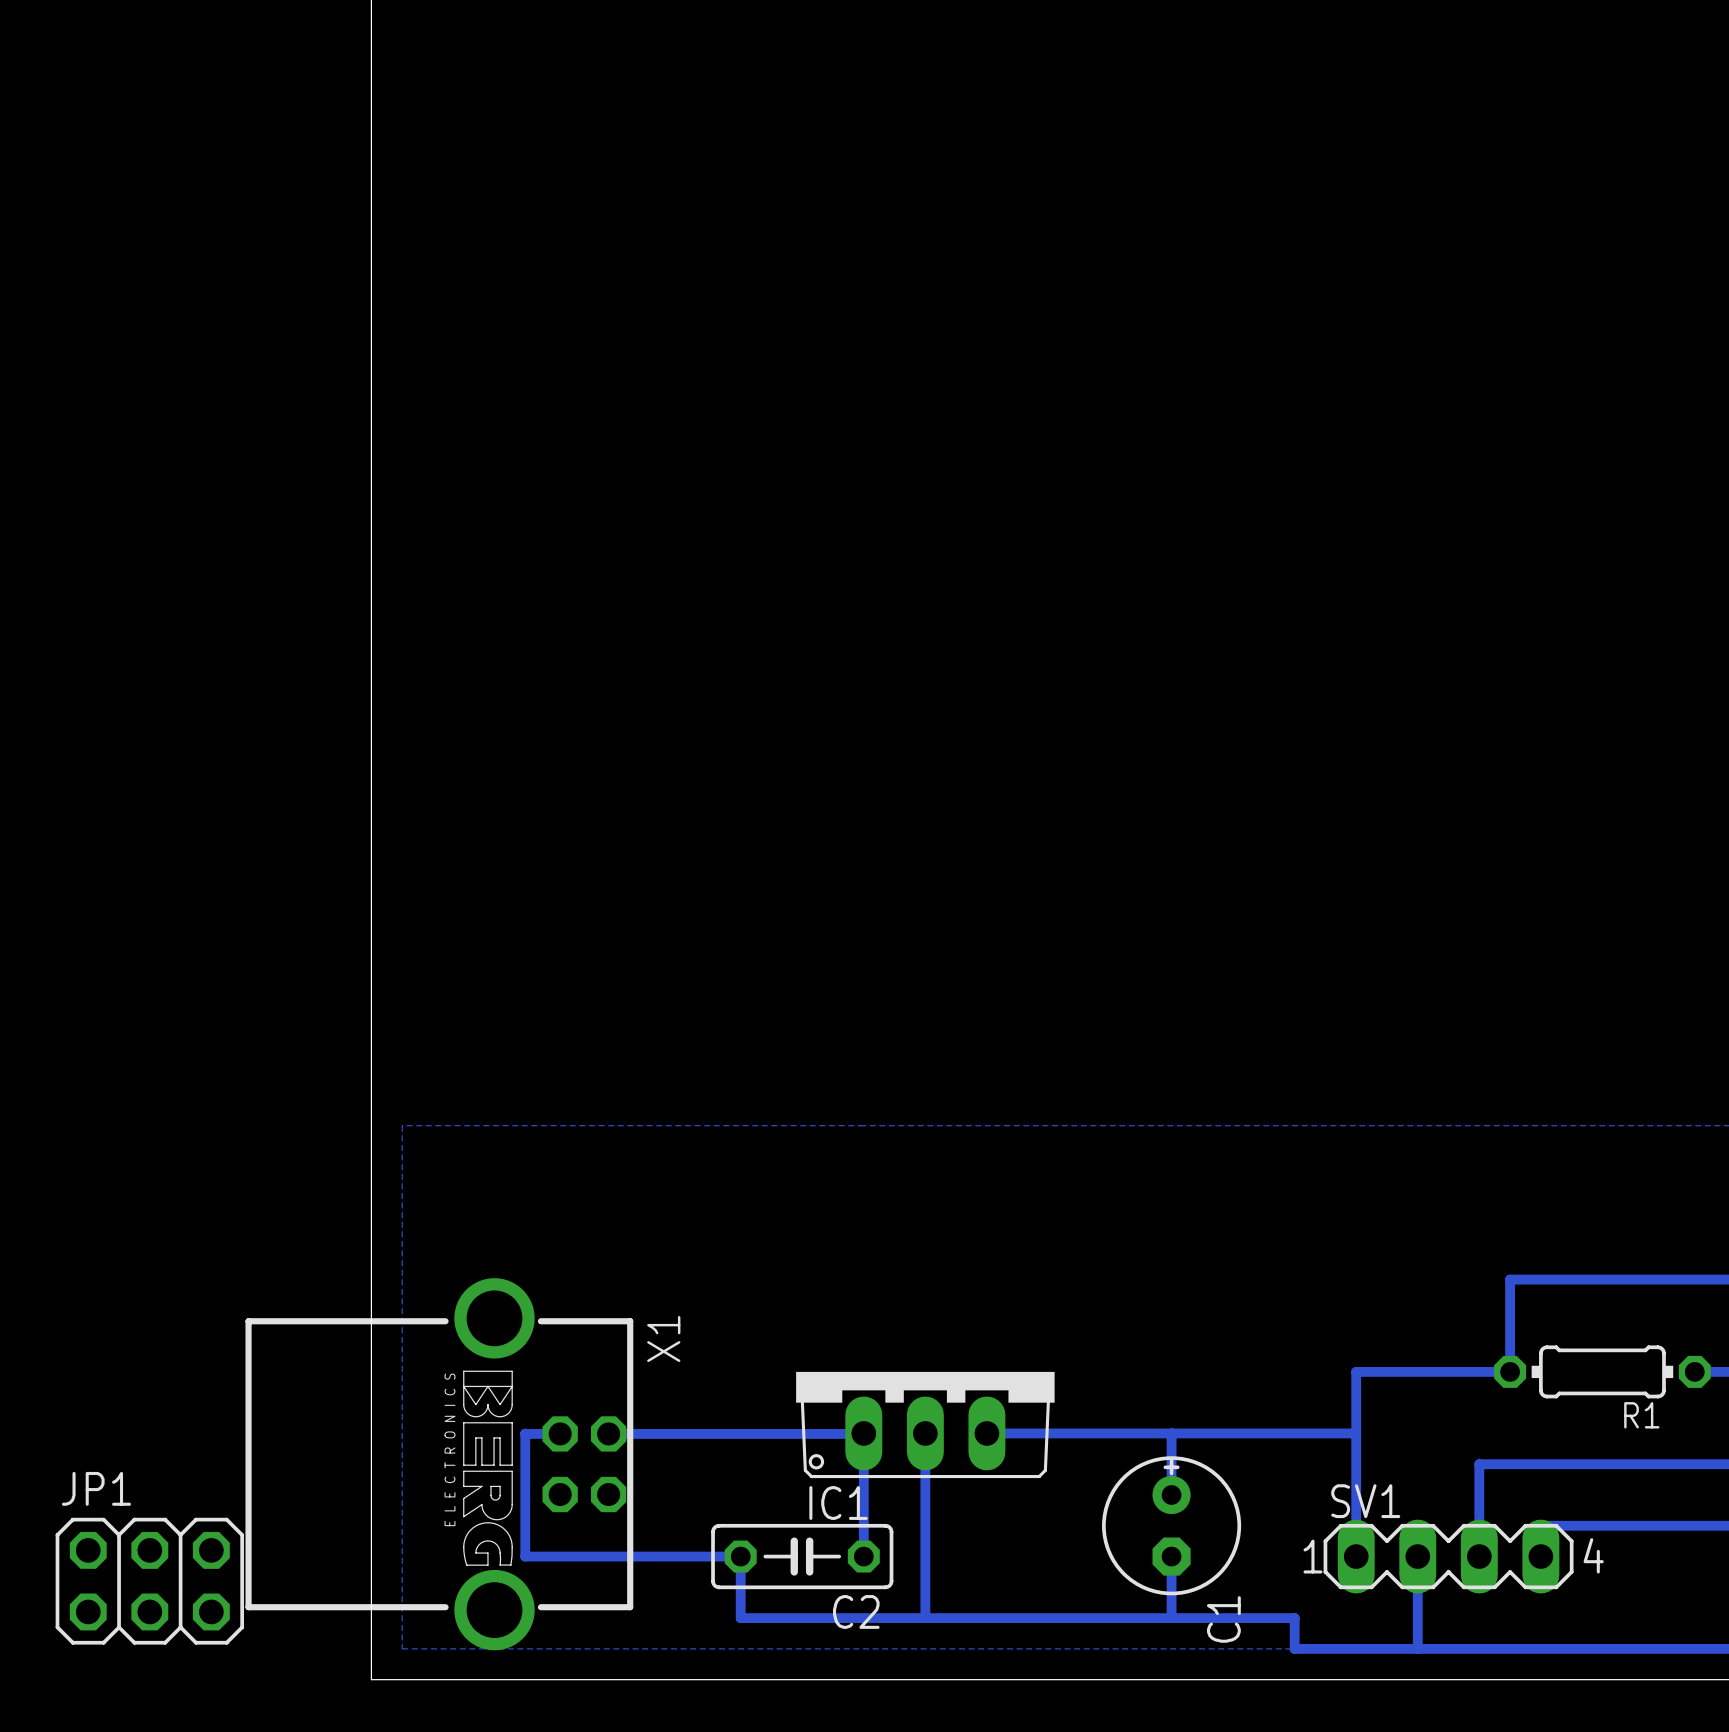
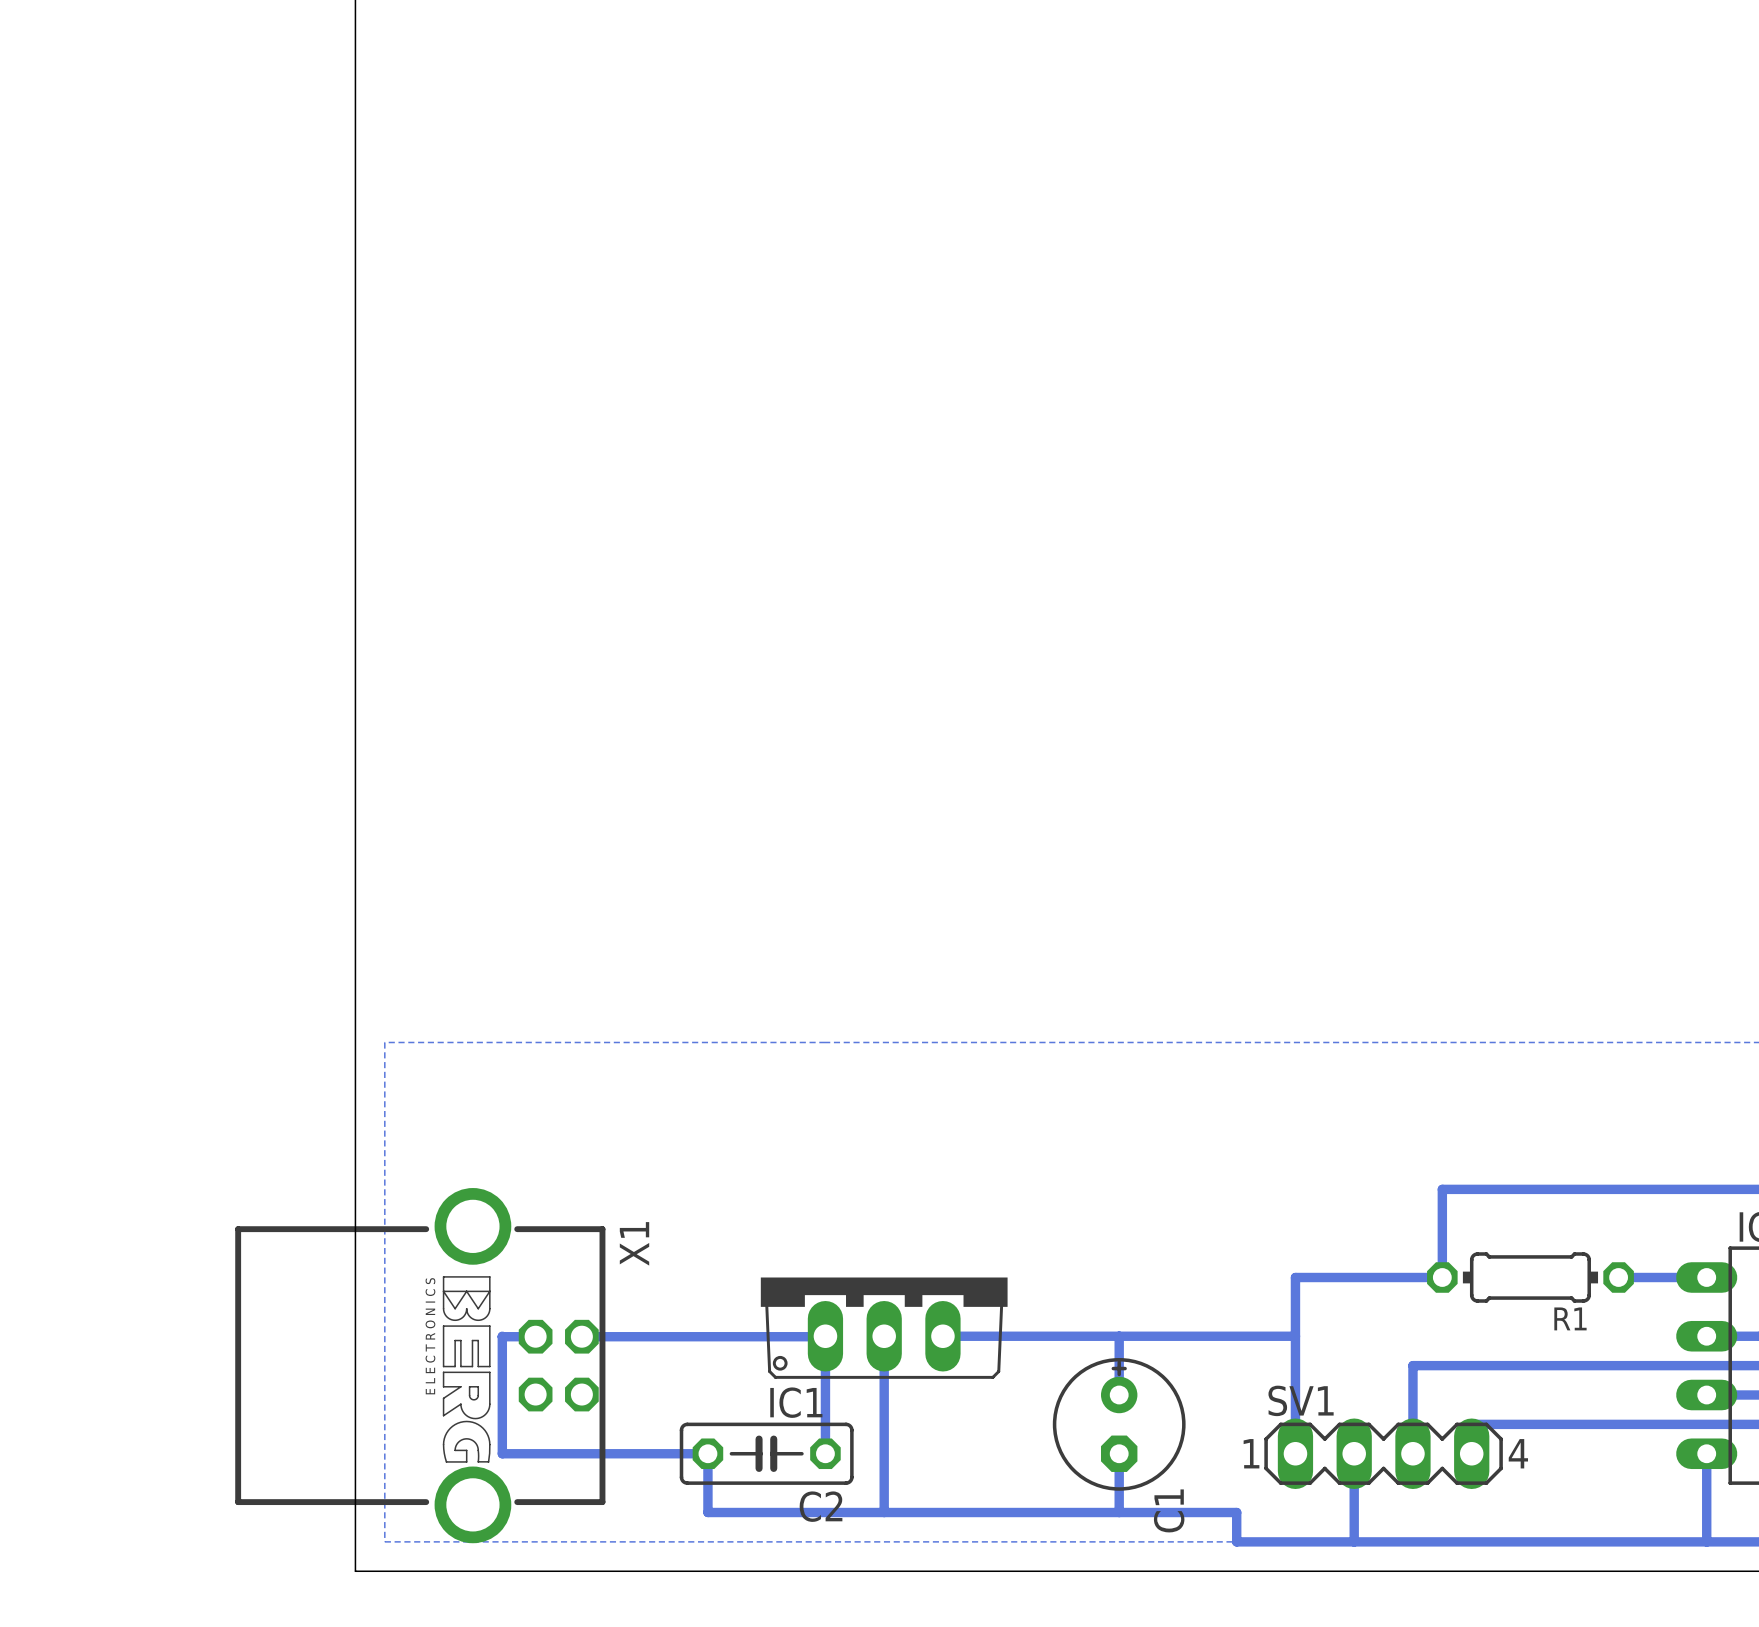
JP1: (149, 1581) -> none

